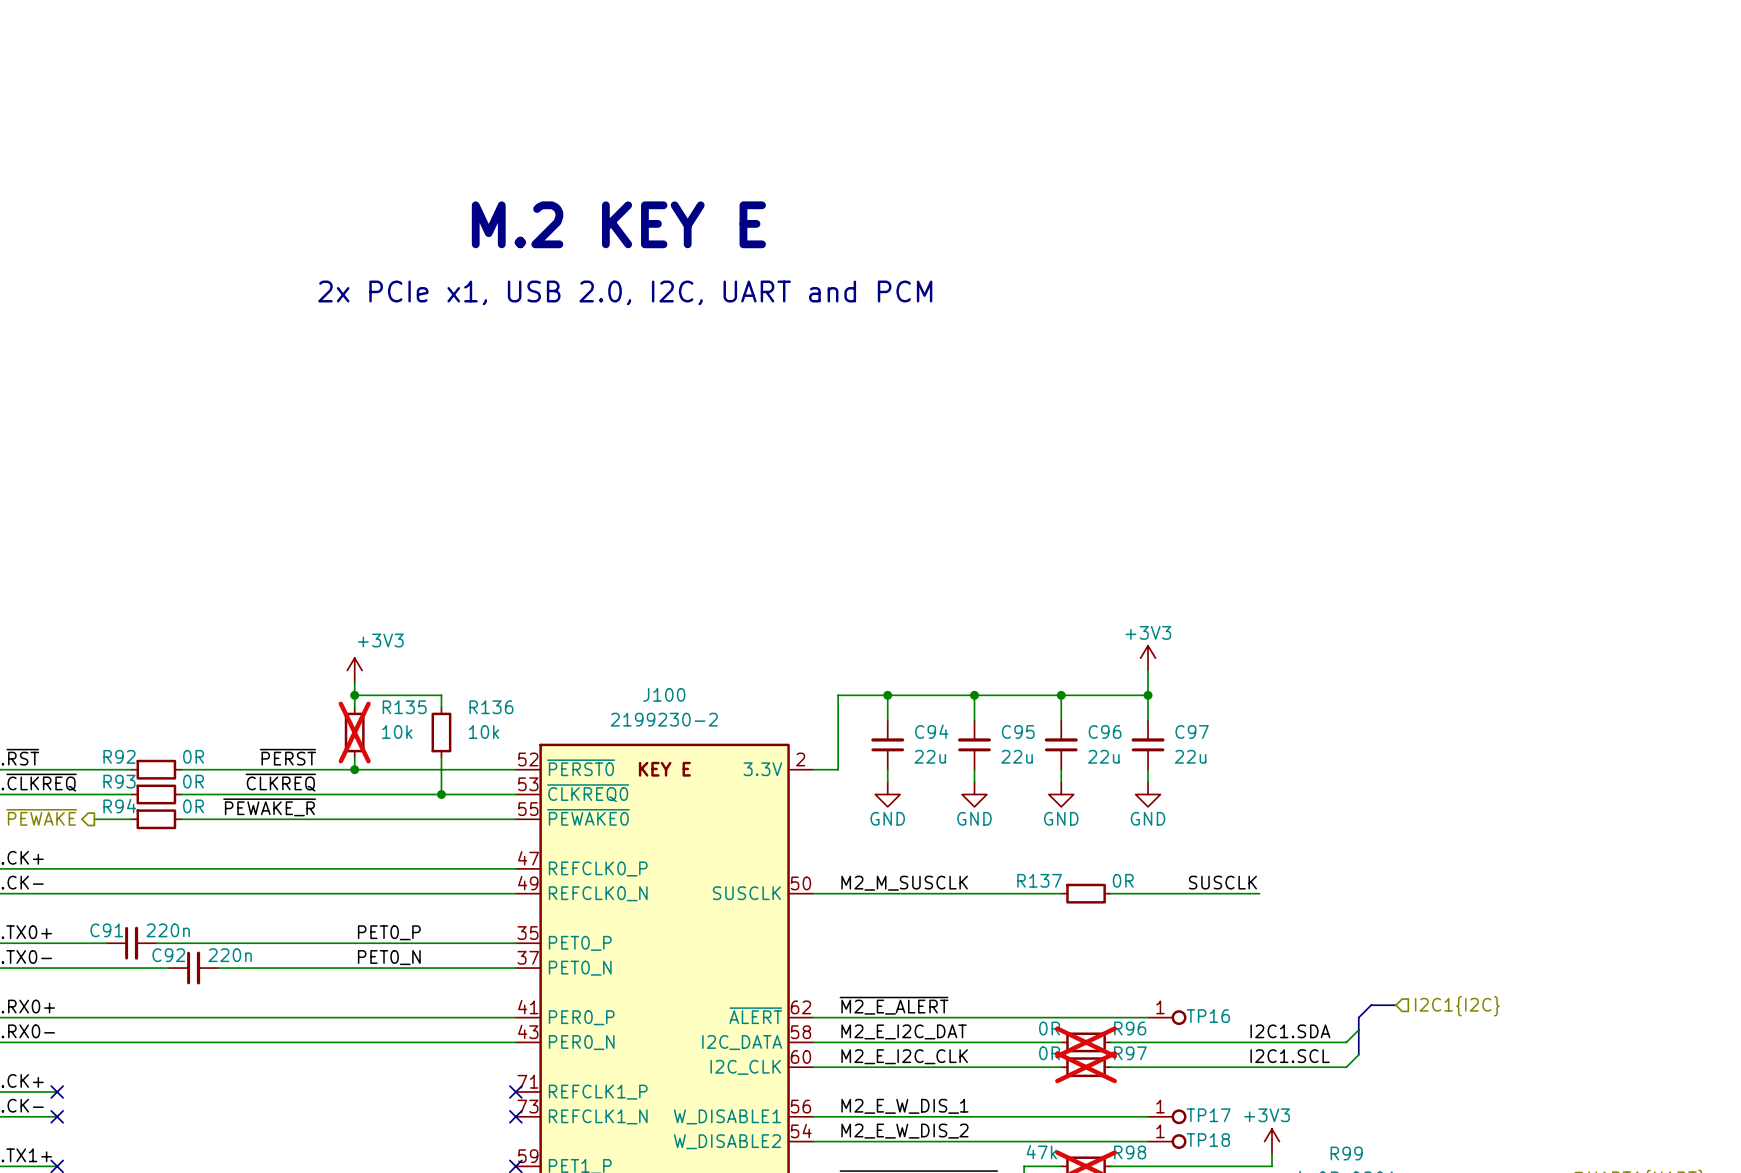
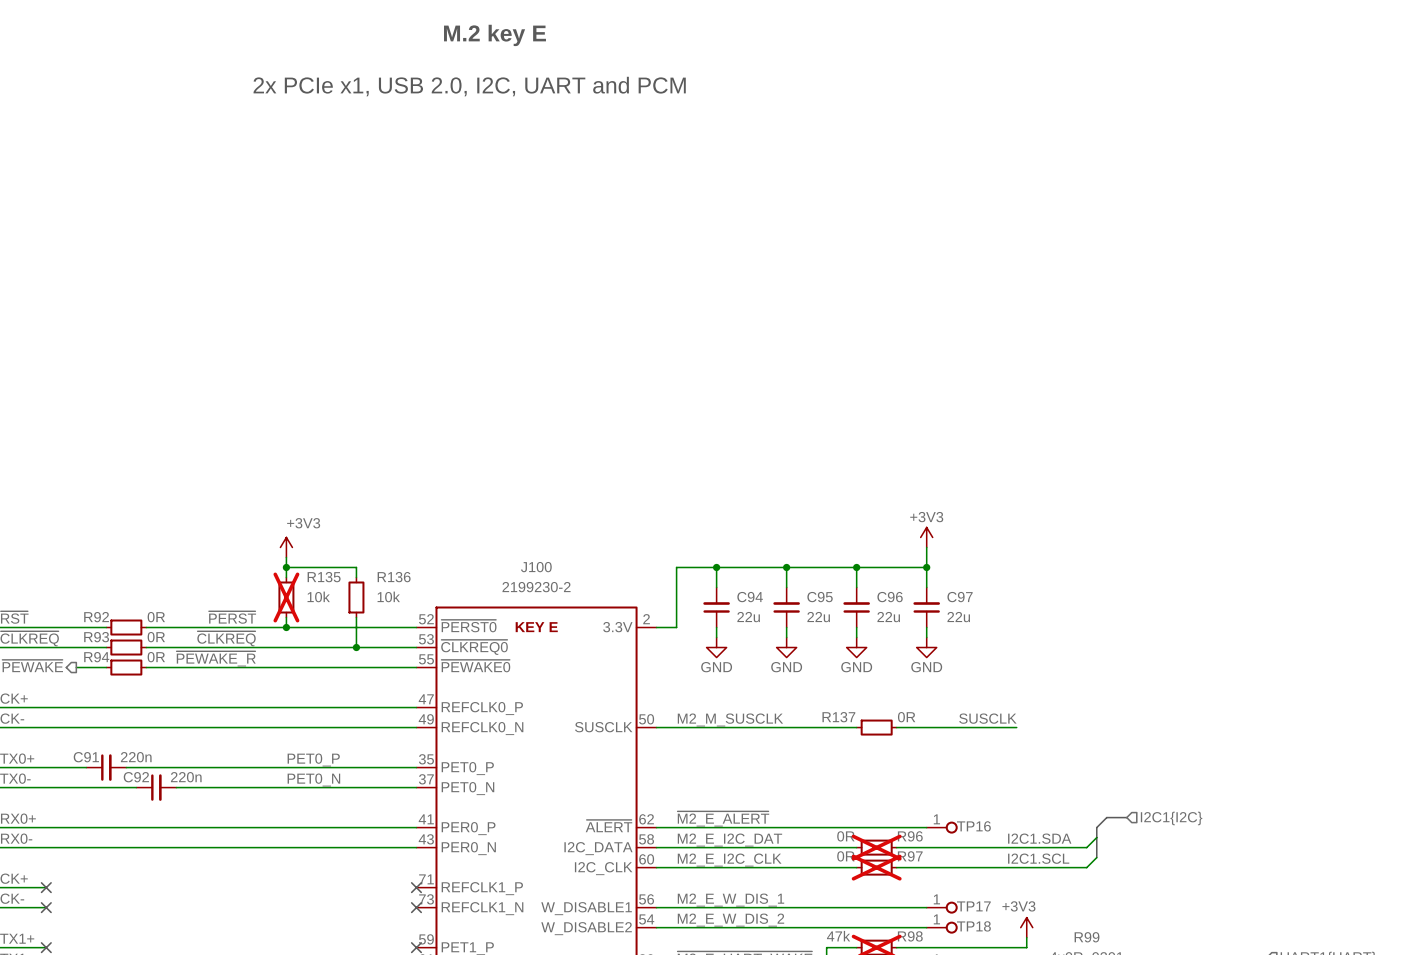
text: none -> M.2 key E (494, 35)
text: M.2 KEY E (618, 224) -> none
text position: 2x PCIe x1, USB 2.0, I2C, UART and PCM (625, 292) -> 2x PCIe x1, USB 2.0, I2C, UART and PCM (469, 86)

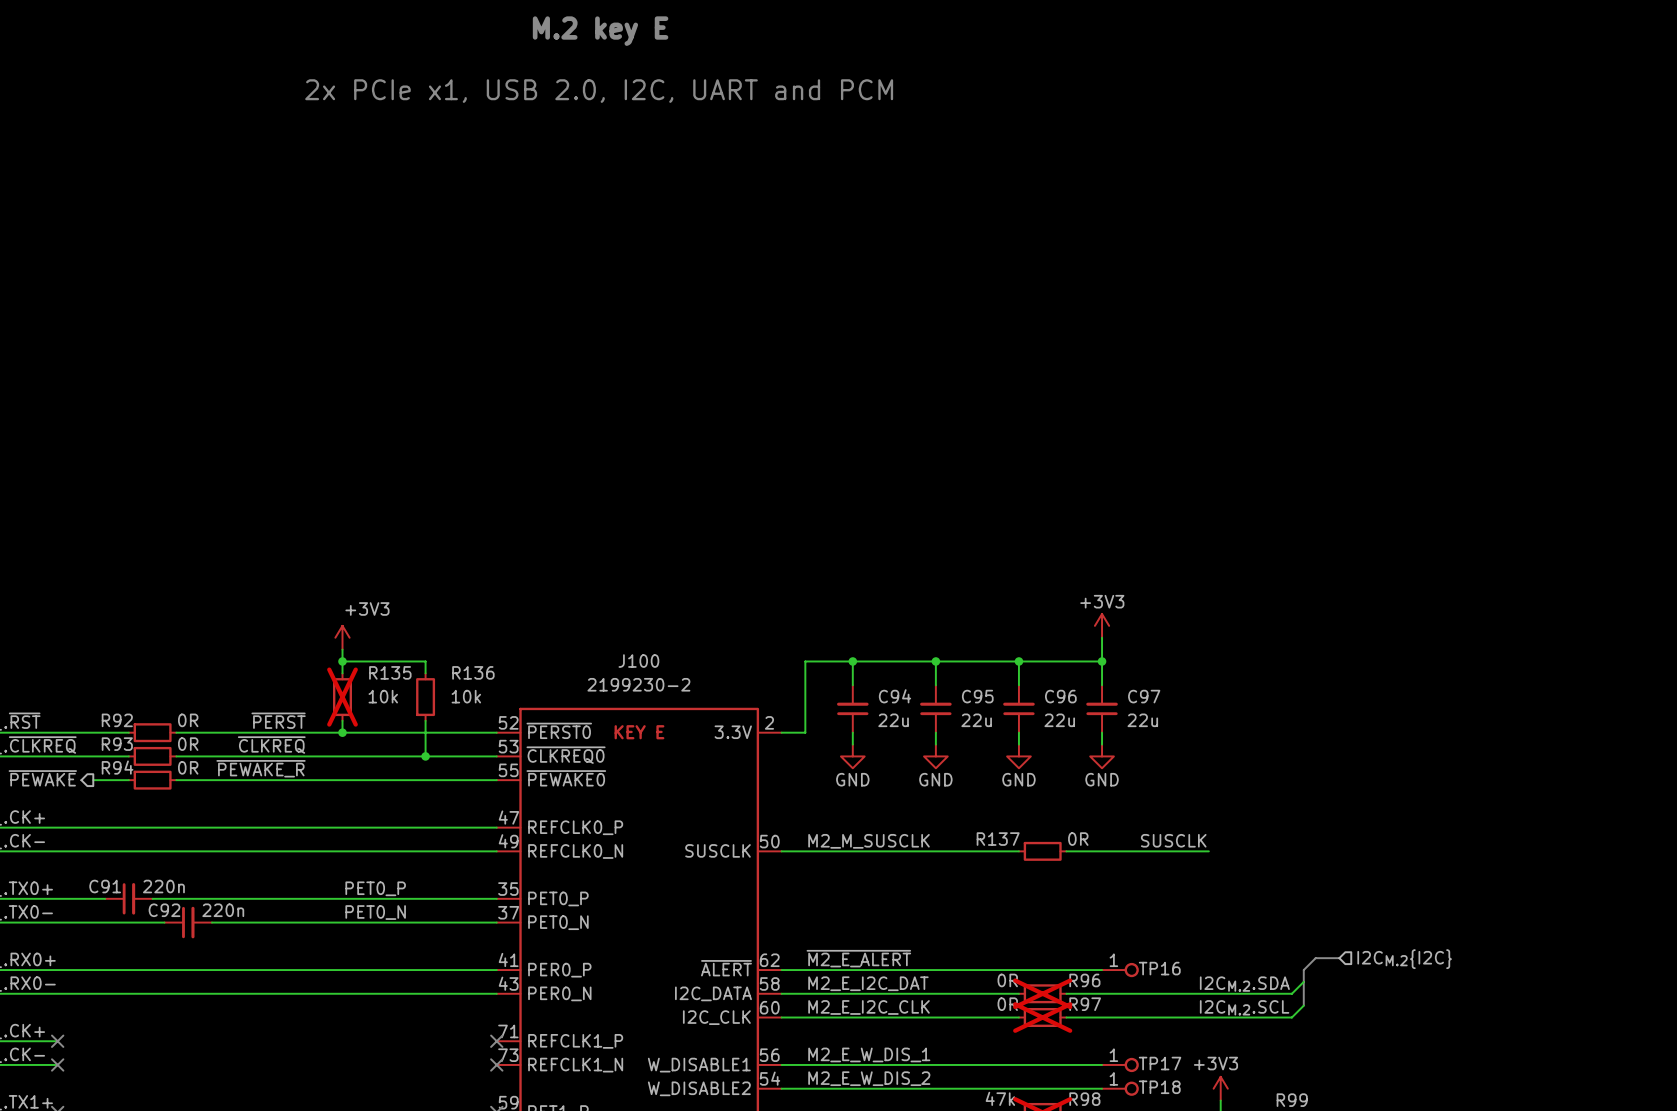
hierarchical label: I2C1{I2C} (1171, 818) -> I2CM.2{I2C} (1404, 959)
label: I2C1.SDA (1039, 838) -> I2CM.2.SDA (1244, 984)
label: I2C1.SCL (1038, 858) -> I2CM.2.SCL (1244, 1007)

